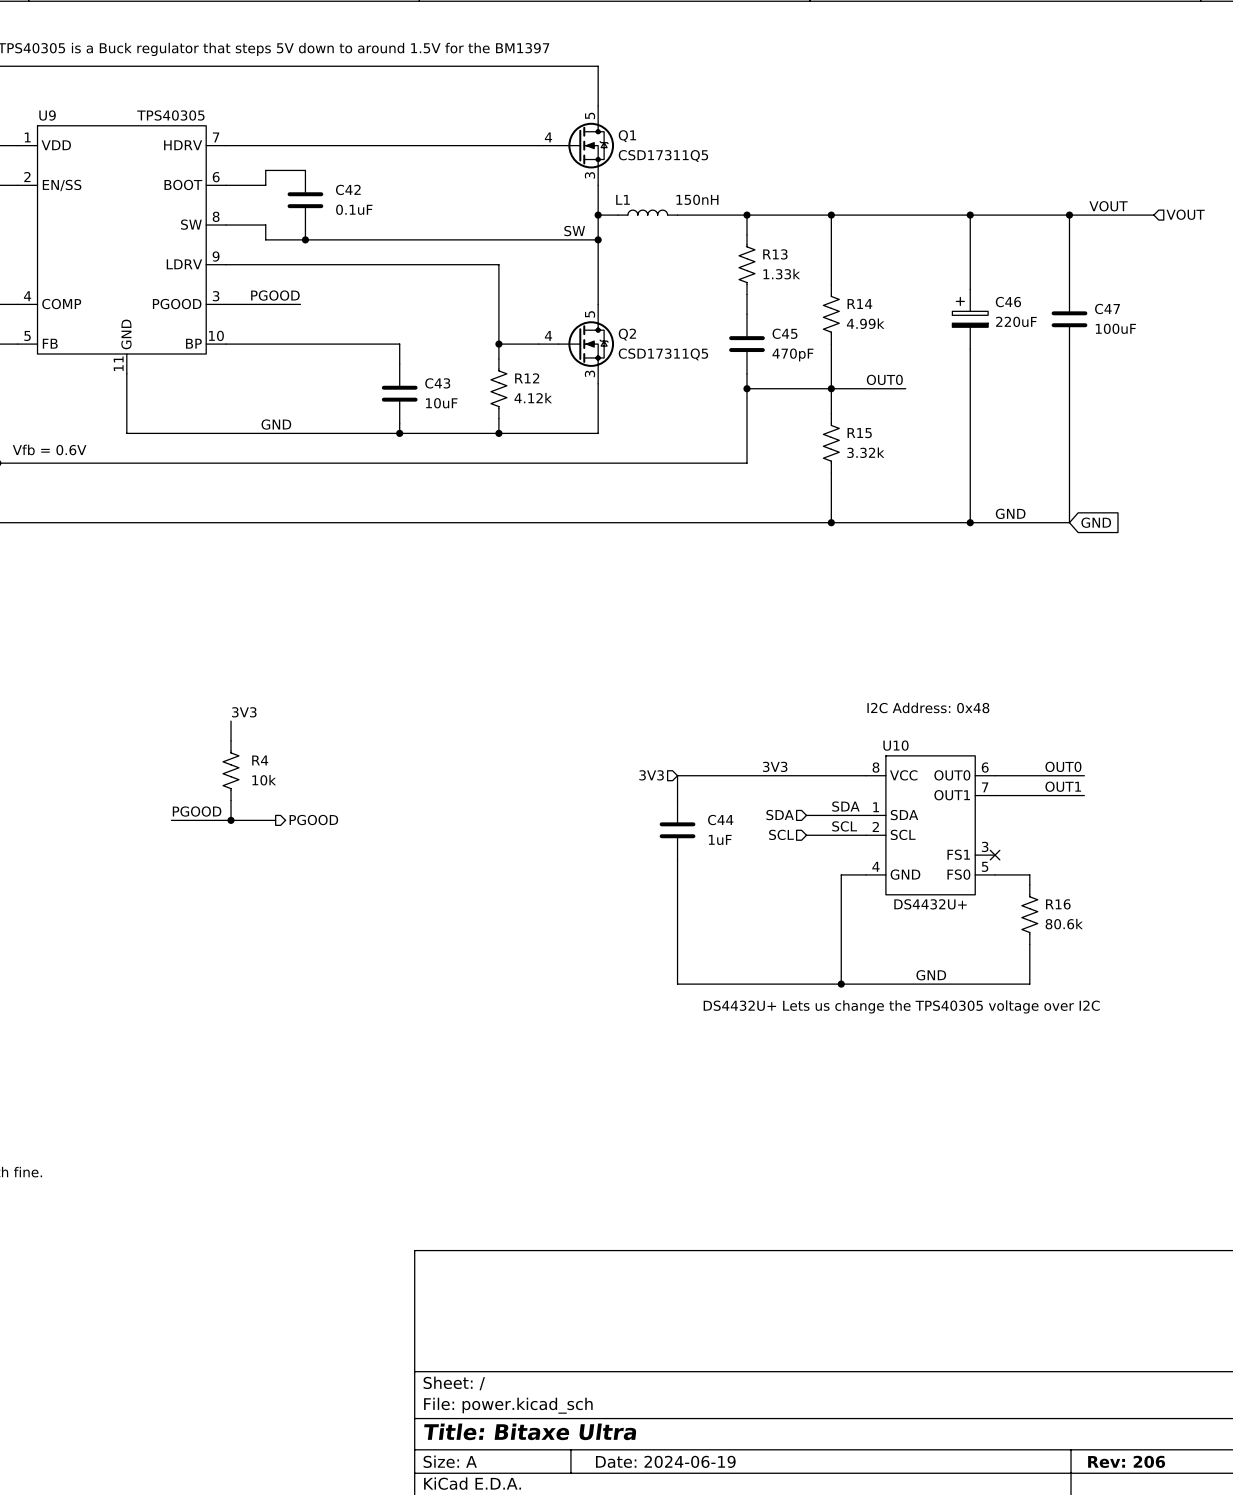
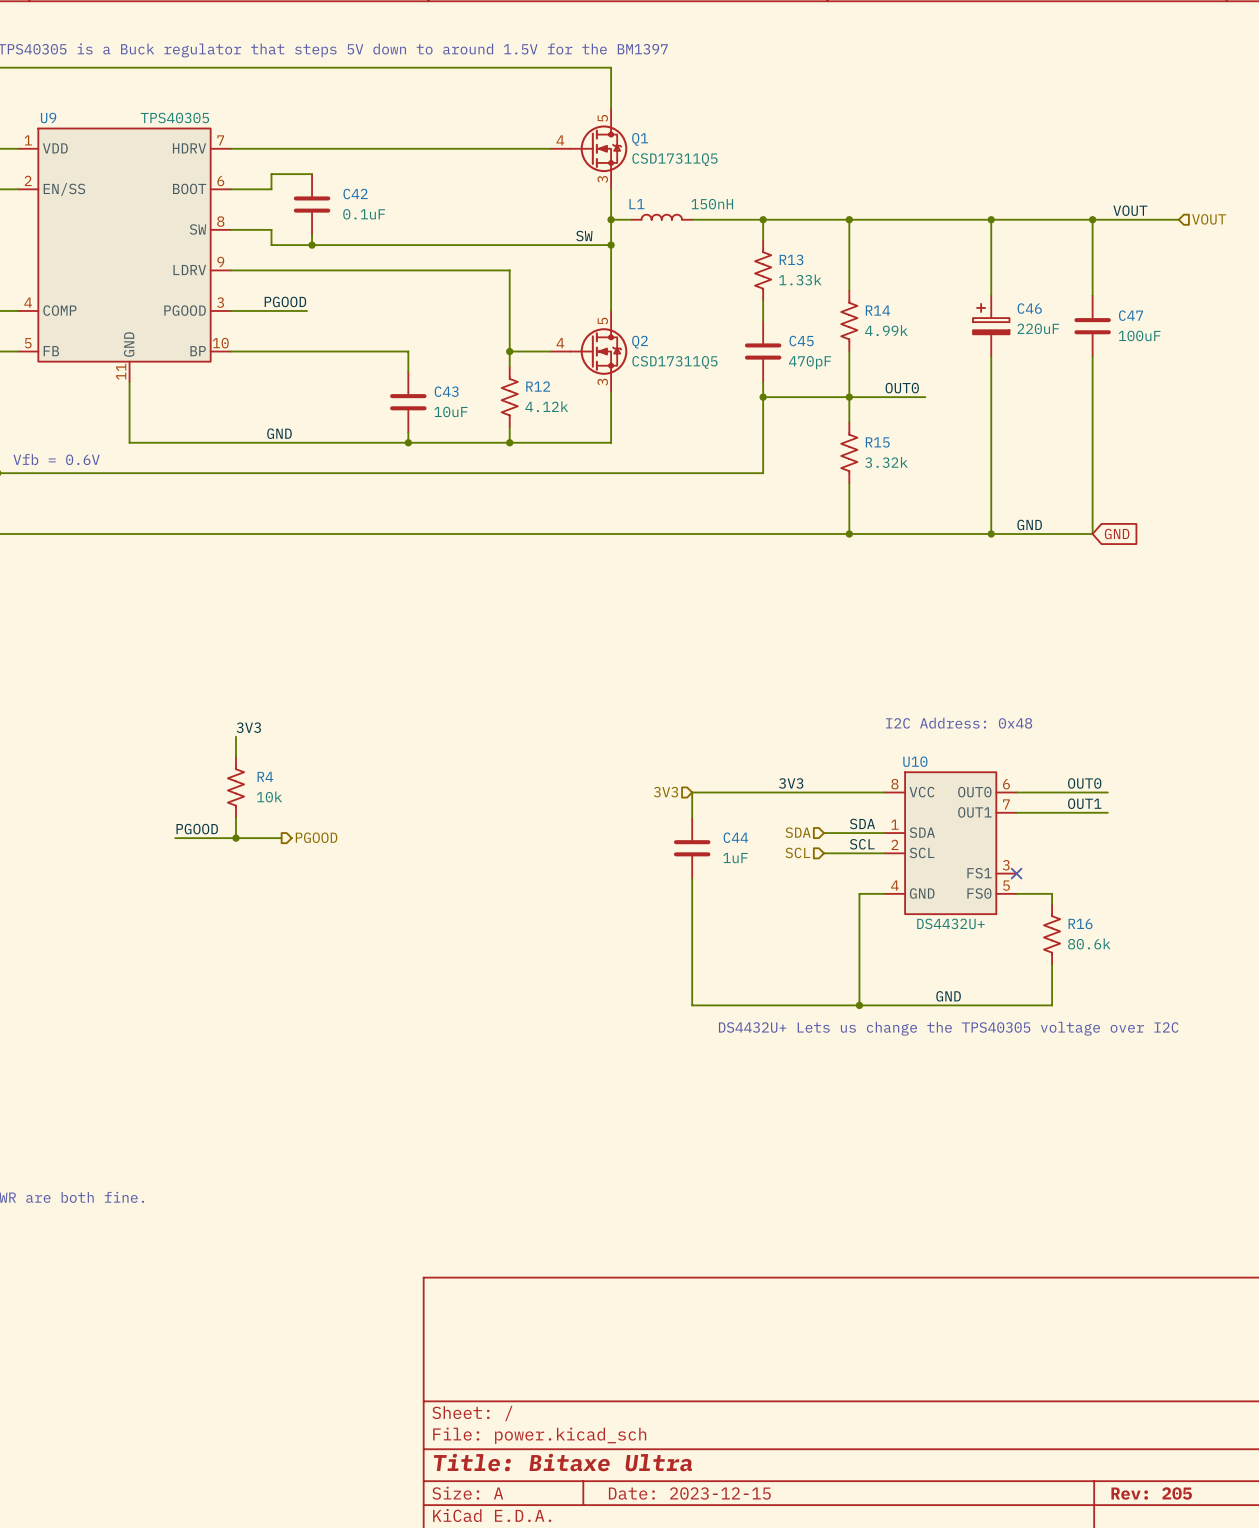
title block: Date: 2024-06-19 (665, 1461) -> Date: 2023-12-15 (689, 1493)
title block: Rev: 206 (1126, 1461) -> Rev: 205 (1151, 1493)

